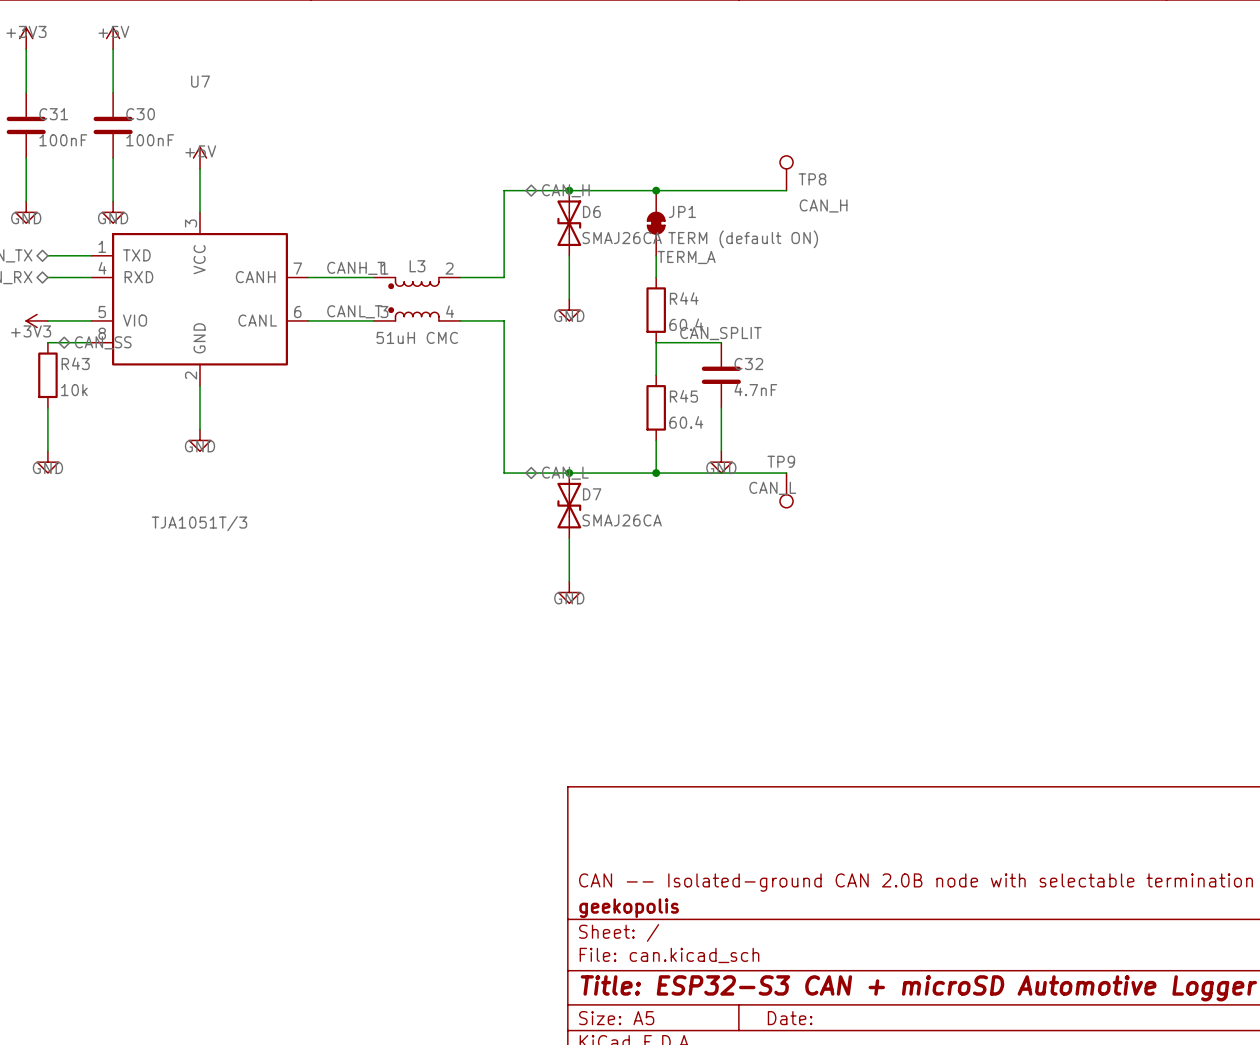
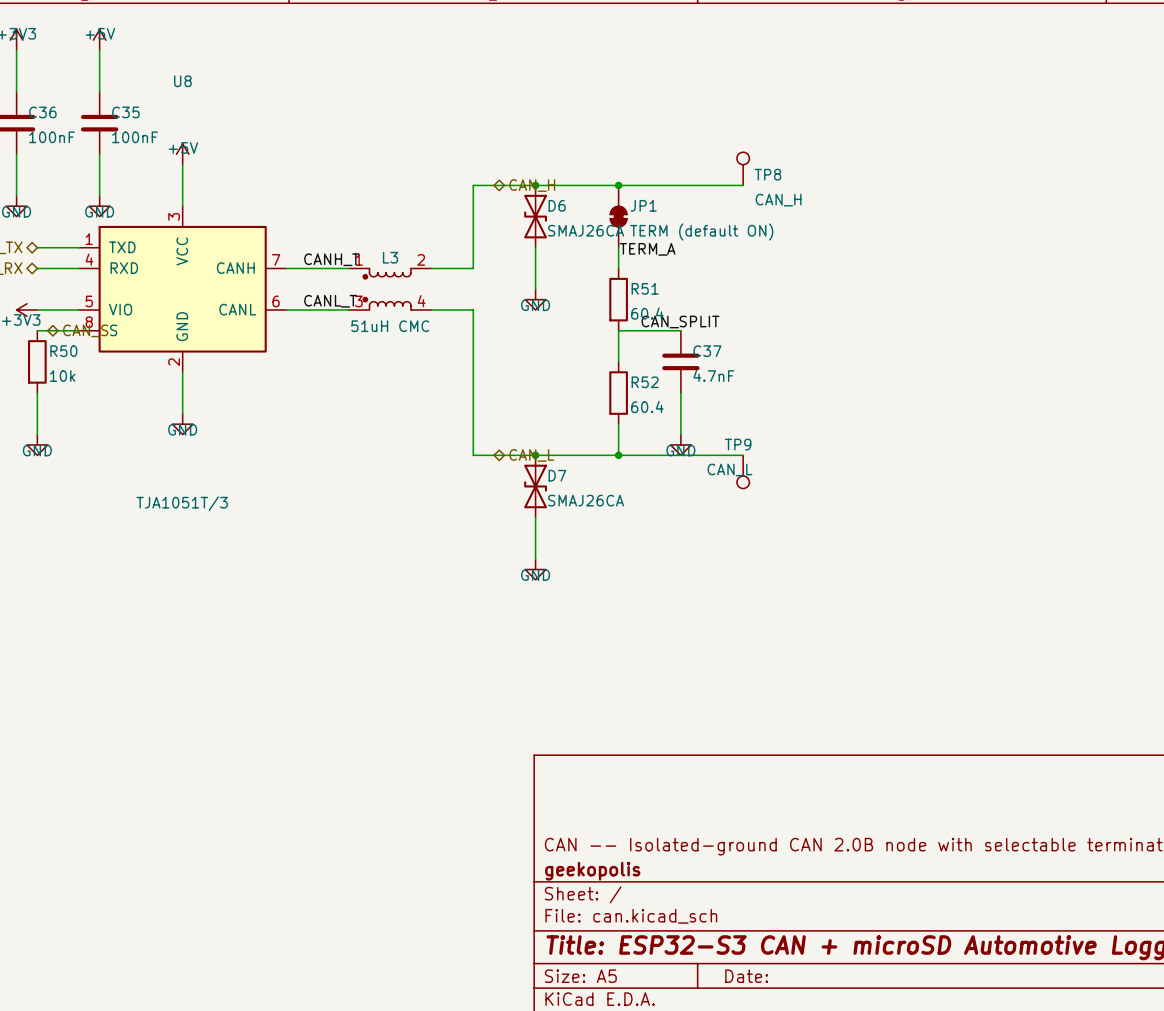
U7 name: U7 (200, 81) -> U8 (182, 81)
C31 name: C31 (53, 114) -> C36 (42, 112)
C30 name: C30 (140, 114) -> C35 (125, 112)
R44 name: R44 (684, 298) -> R51 (645, 288)
R43 name: R43 (75, 363) -> R50 (63, 351)
C32 name: C32 (748, 364) -> C37 (707, 351)
R45 name: R45 (683, 396) -> R52 (645, 382)

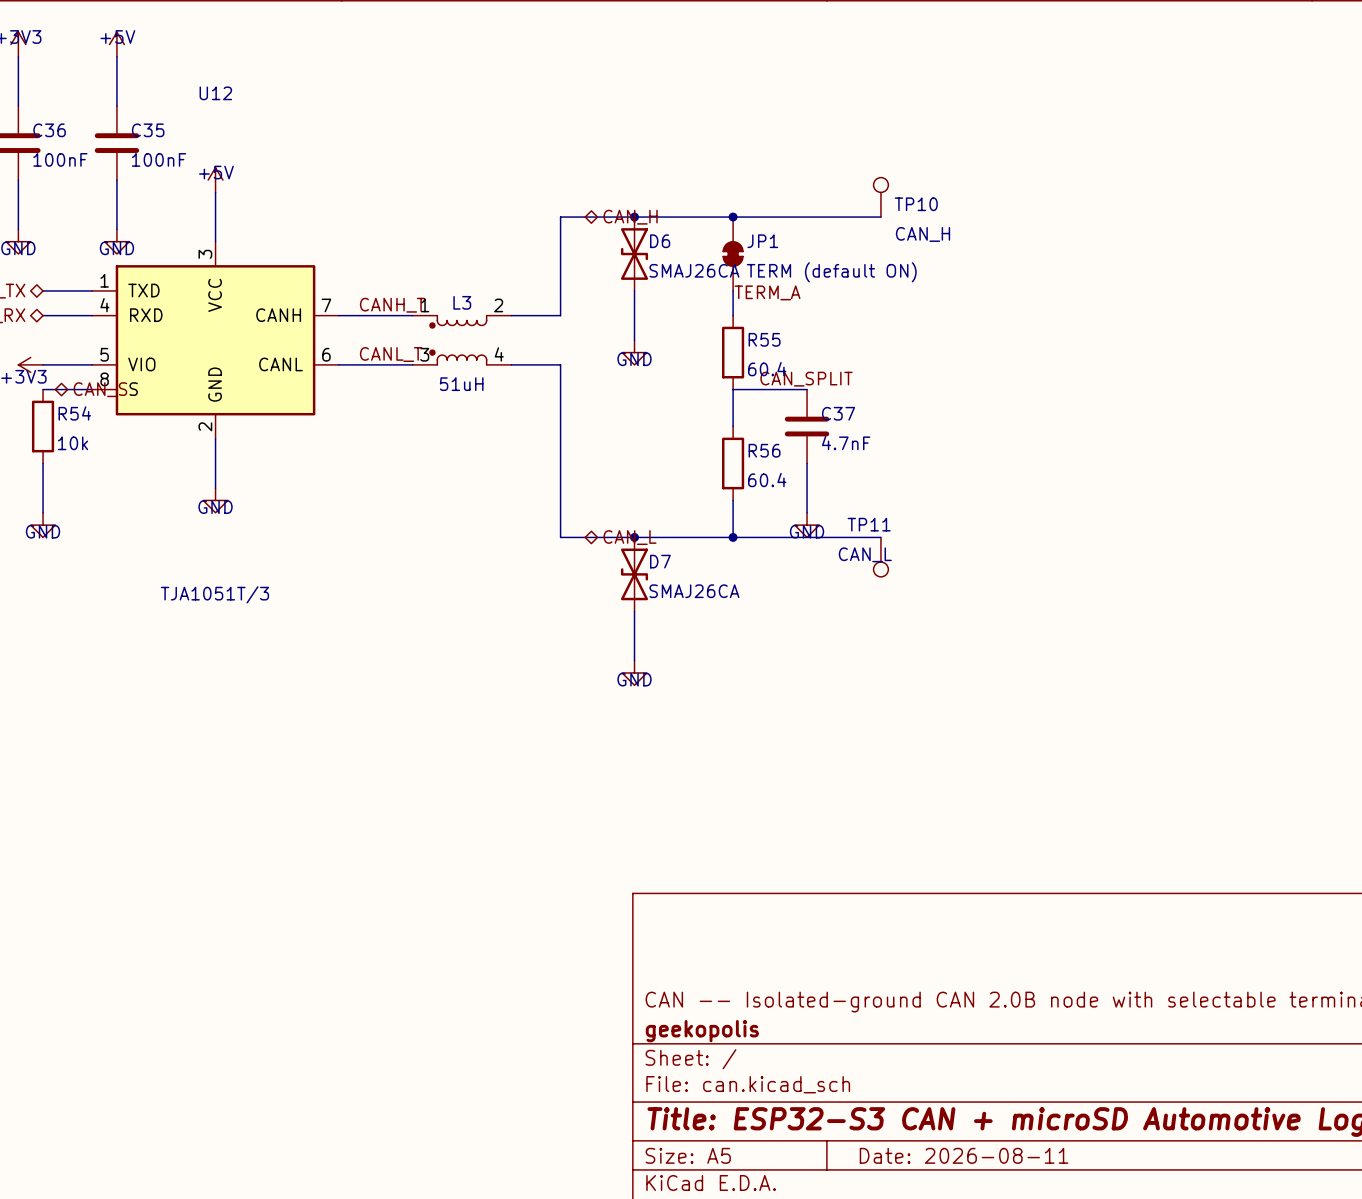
U8 name: U8 (182, 81) -> U12 (215, 93)
TP8 name: TP8 (767, 174) -> TP10 (916, 204)
R51 name: R51 (645, 288) -> R55 (764, 339)
L3 value: 51uH CMC (390, 326) -> 51uH (461, 384)
R50 name: R50 (63, 351) -> R54 (74, 413)
R52 name: R52 (645, 382) -> R56 (764, 450)
TP9 name: TP9 (738, 444) -> TP11 (869, 524)
title block: Date: (746, 976) -> Date: 2026-08-11 (964, 1155)

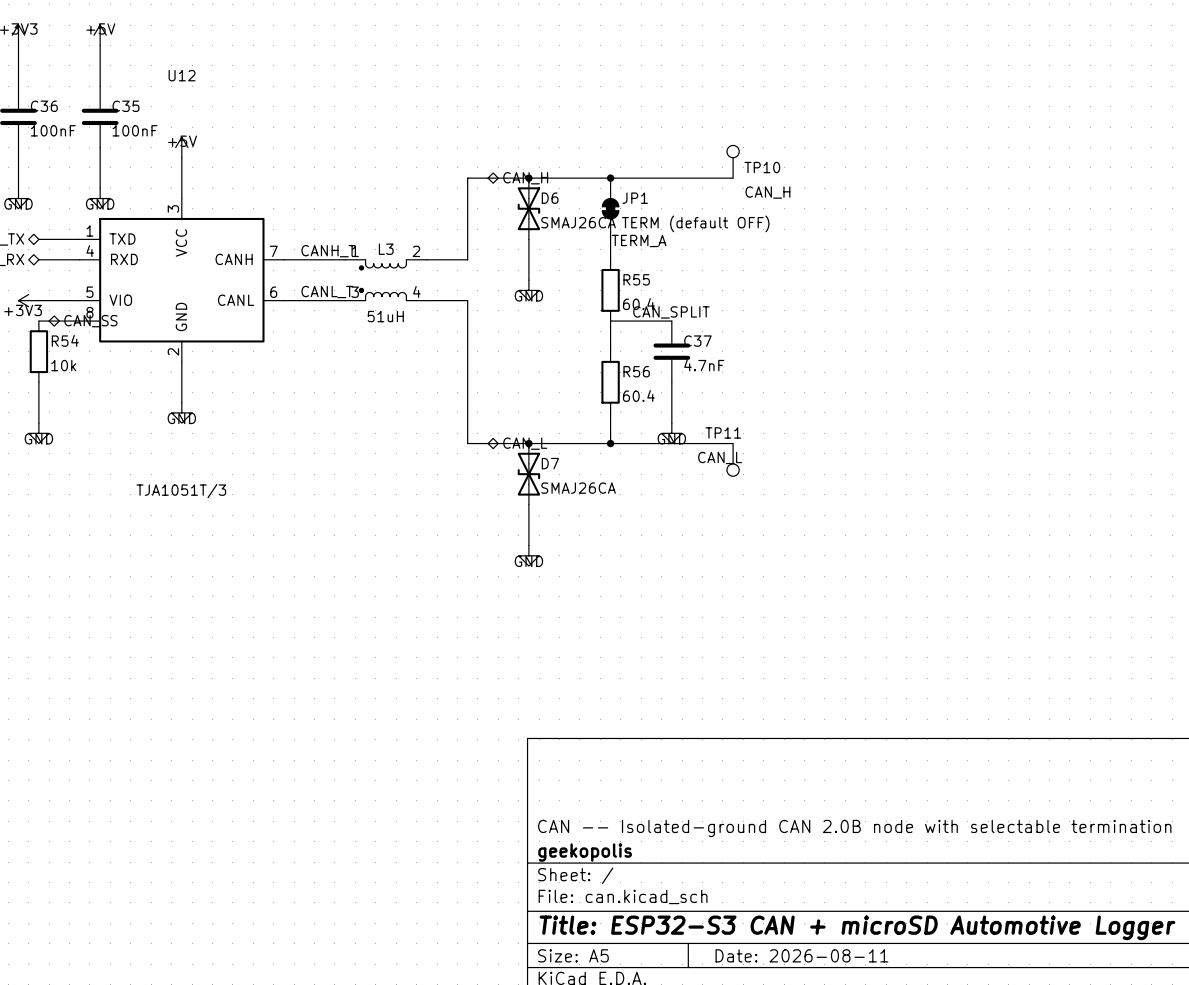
JP1 value: TERM (default ON) (831, 272) -> TERM (default OFF) (695, 223)

